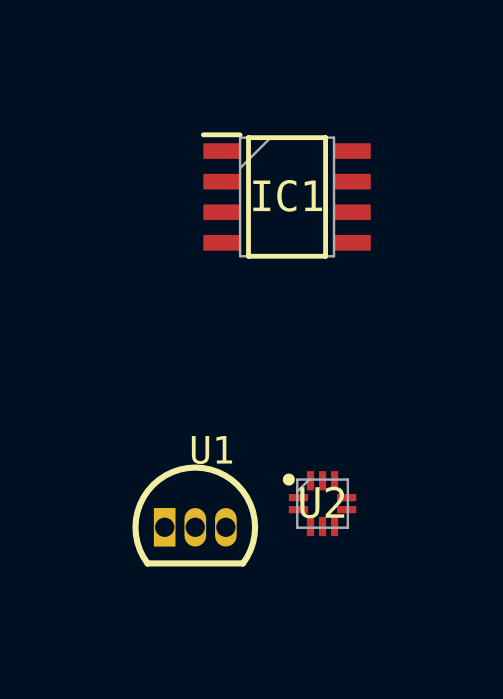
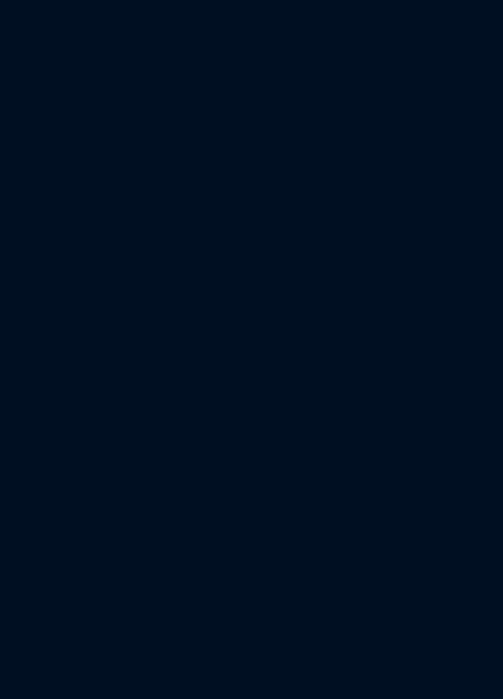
IC1: (285, 195) -> none
U2: (319, 503) -> none
U1: (195, 515) -> none

